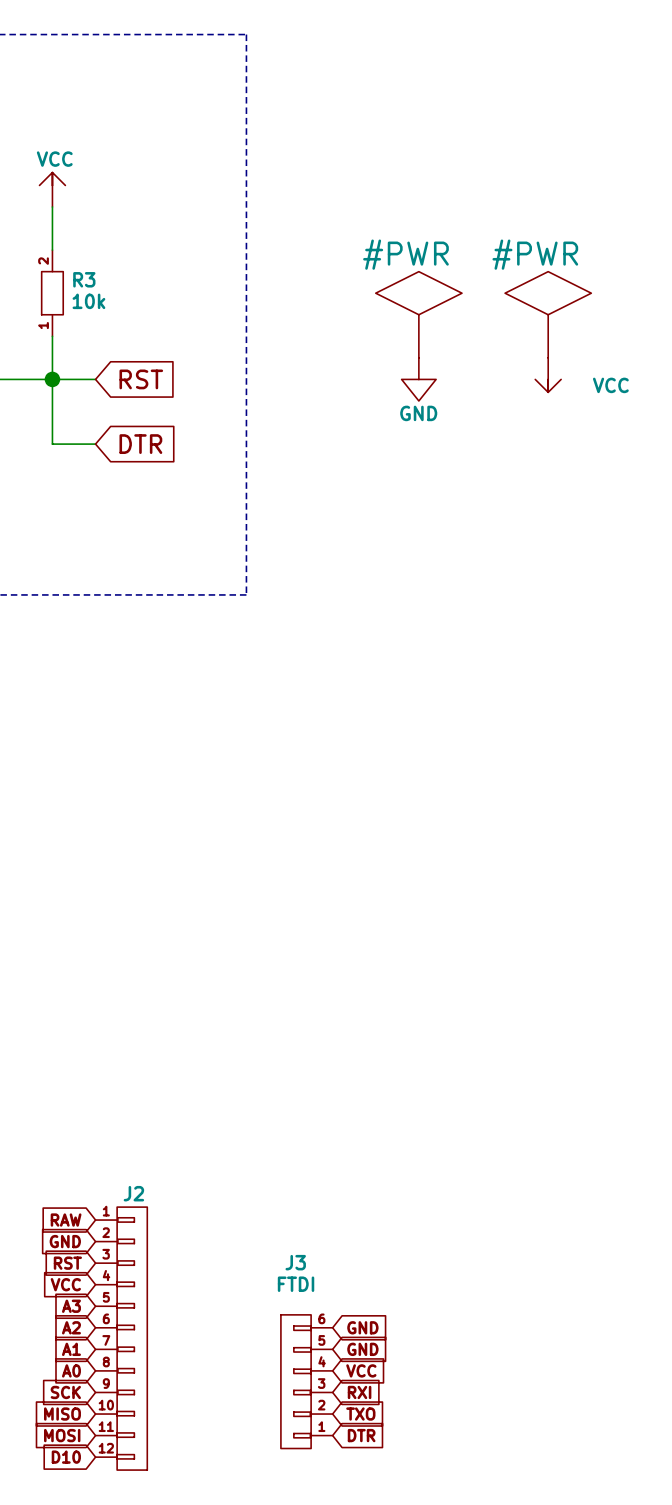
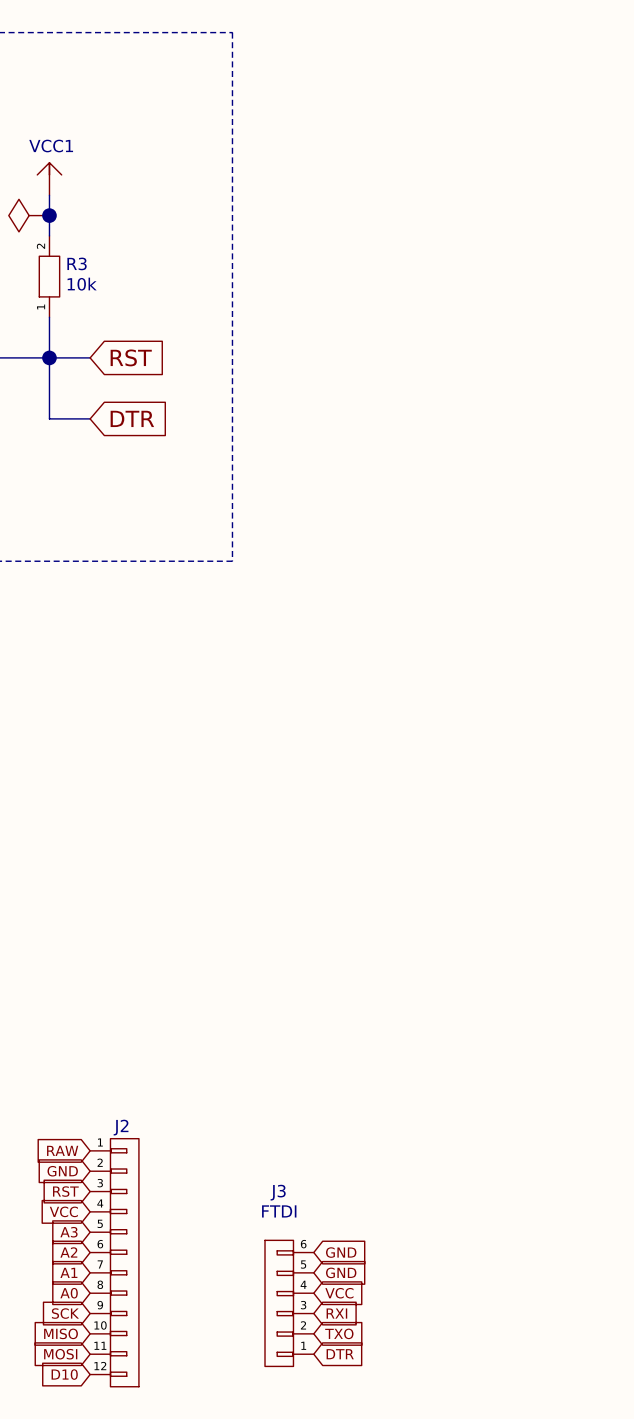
power symbol: VCC (52, 189) -> none
VCC1: none -> (49, 178)
power symbol: none -> (29, 215)
junction: none -> (49, 215)
power symbol: #PWR (418, 314) -> none
power symbol: #PWR (548, 314) -> none
power symbol: VCC (548, 375) -> none
power symbol: GND (418, 379) -> none

